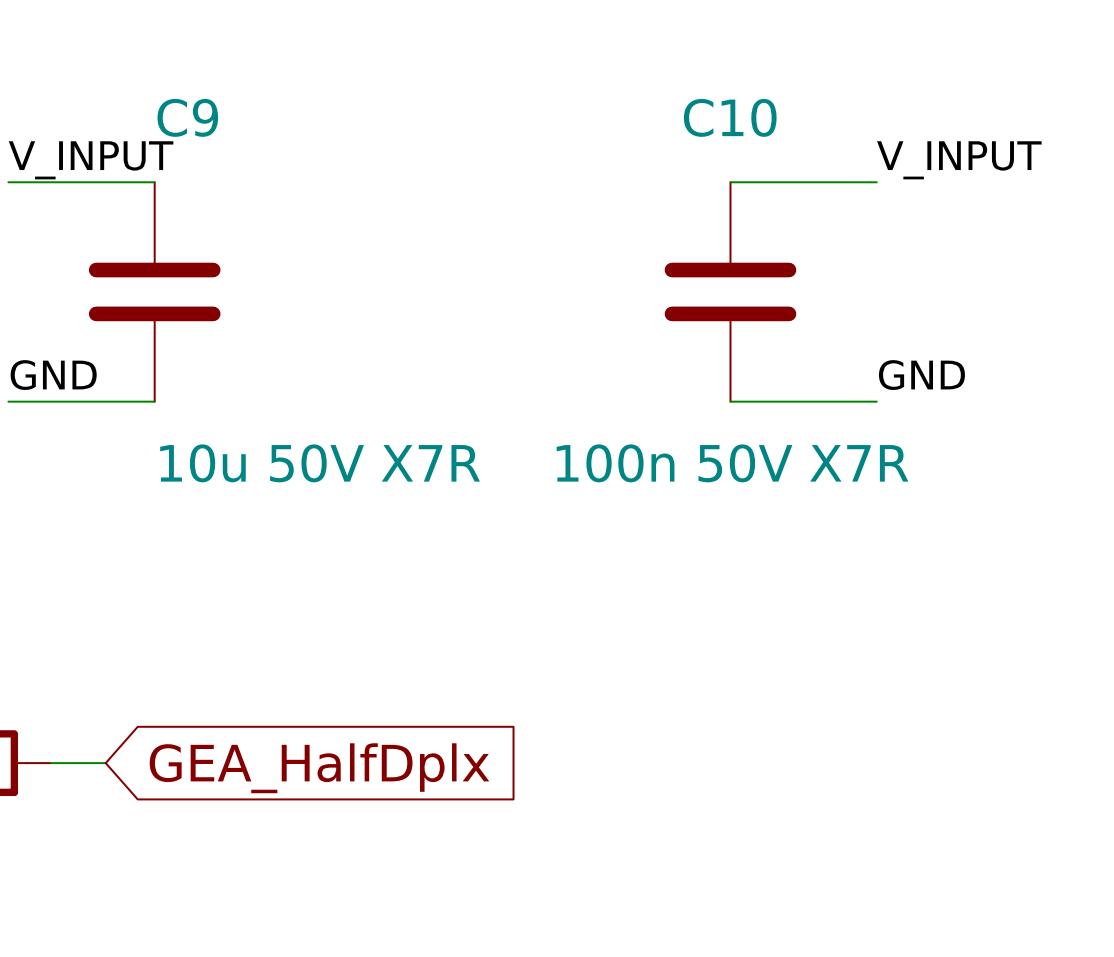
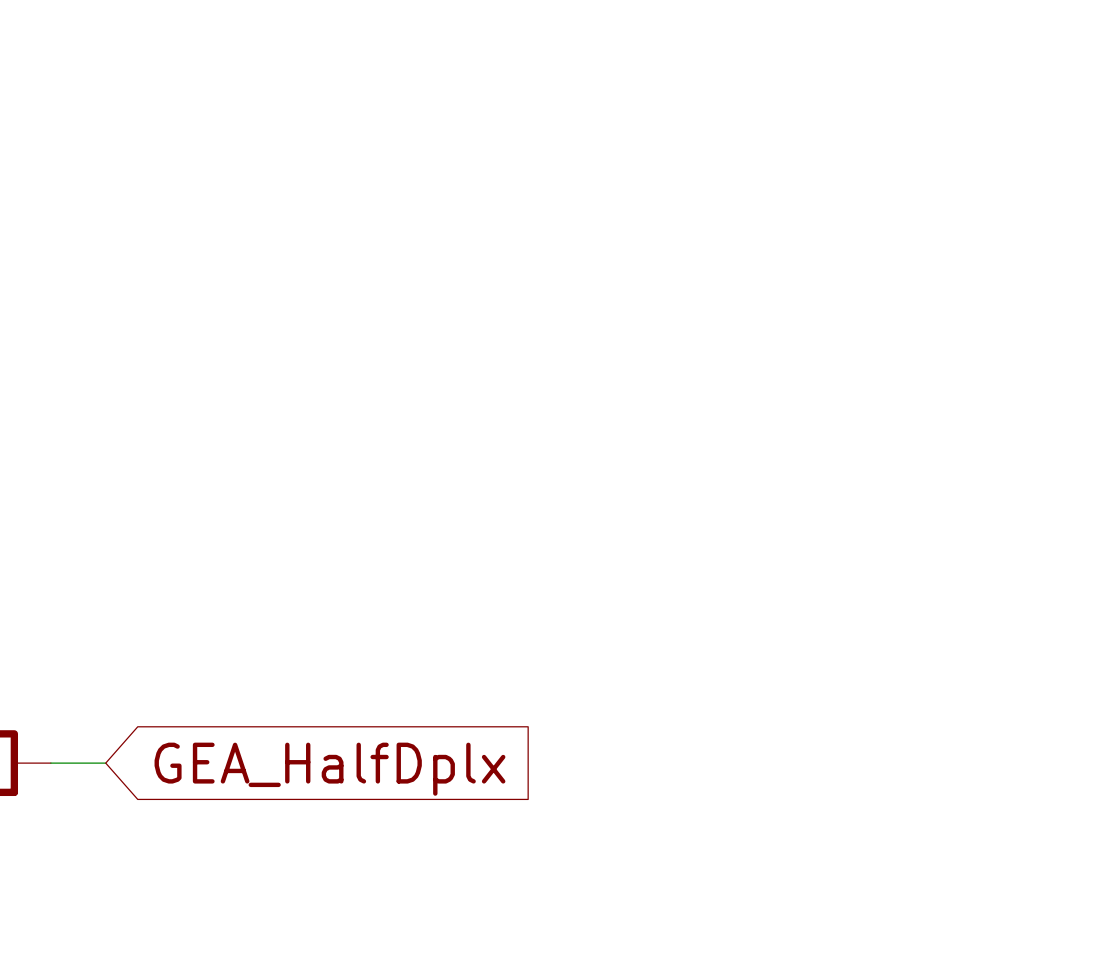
label: V_INPUT (91, 160) -> none
label: V_INPUT (959, 160) -> none
wire: (8, 182) (154, 182) -> none
wire: (730, 182) (876, 182) -> none
C9: 10u 50V X7R (154, 291) -> none
C10: 100n 50V X7R (730, 291) -> none
label: GND (53, 375) -> none
label: GND (921, 375) -> none
wire: (8, 401) (154, 401) -> none
wire: (730, 401) (876, 401) -> none

